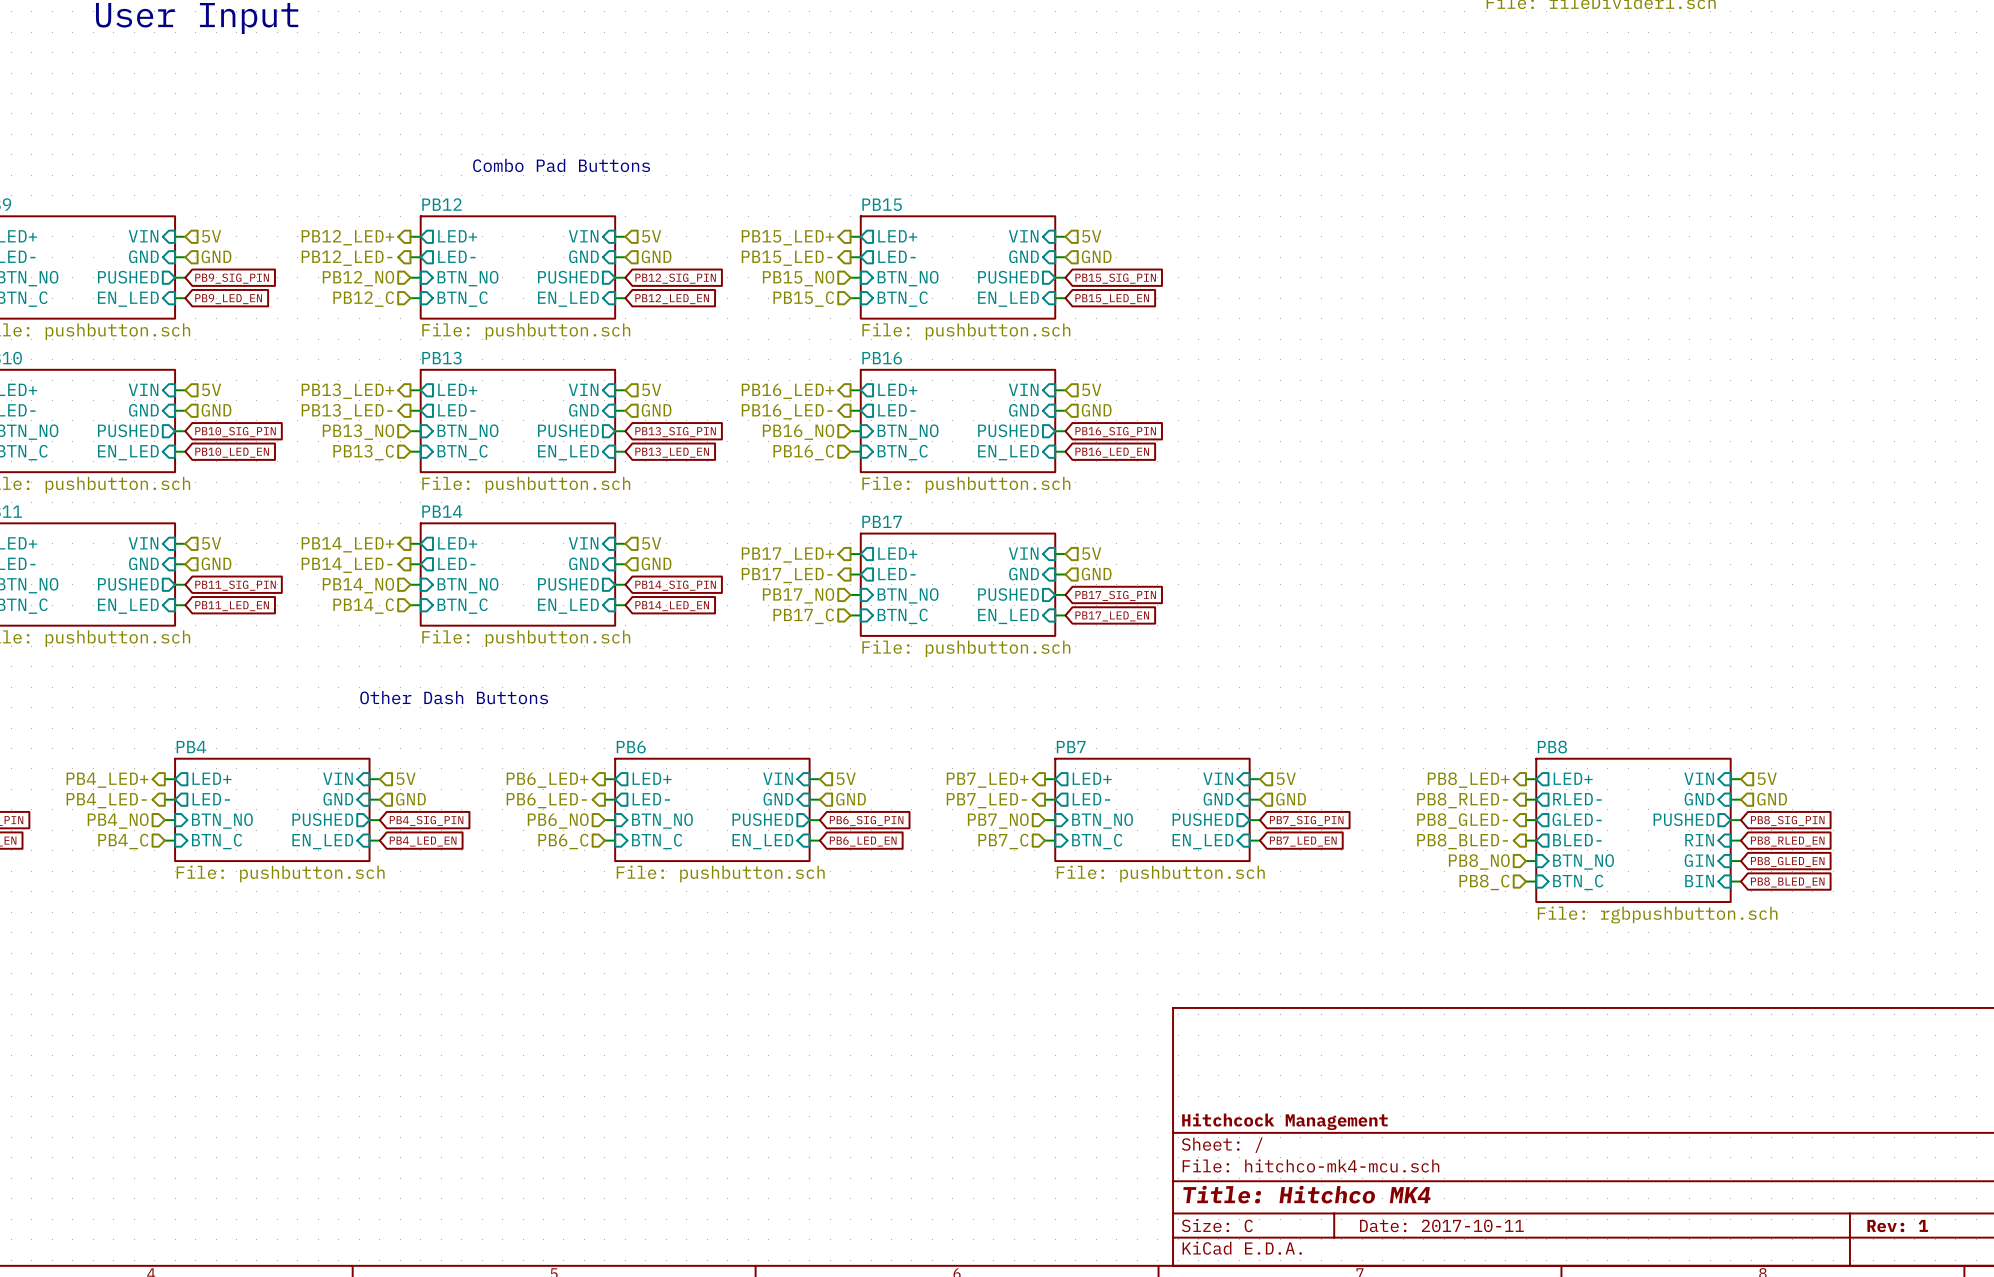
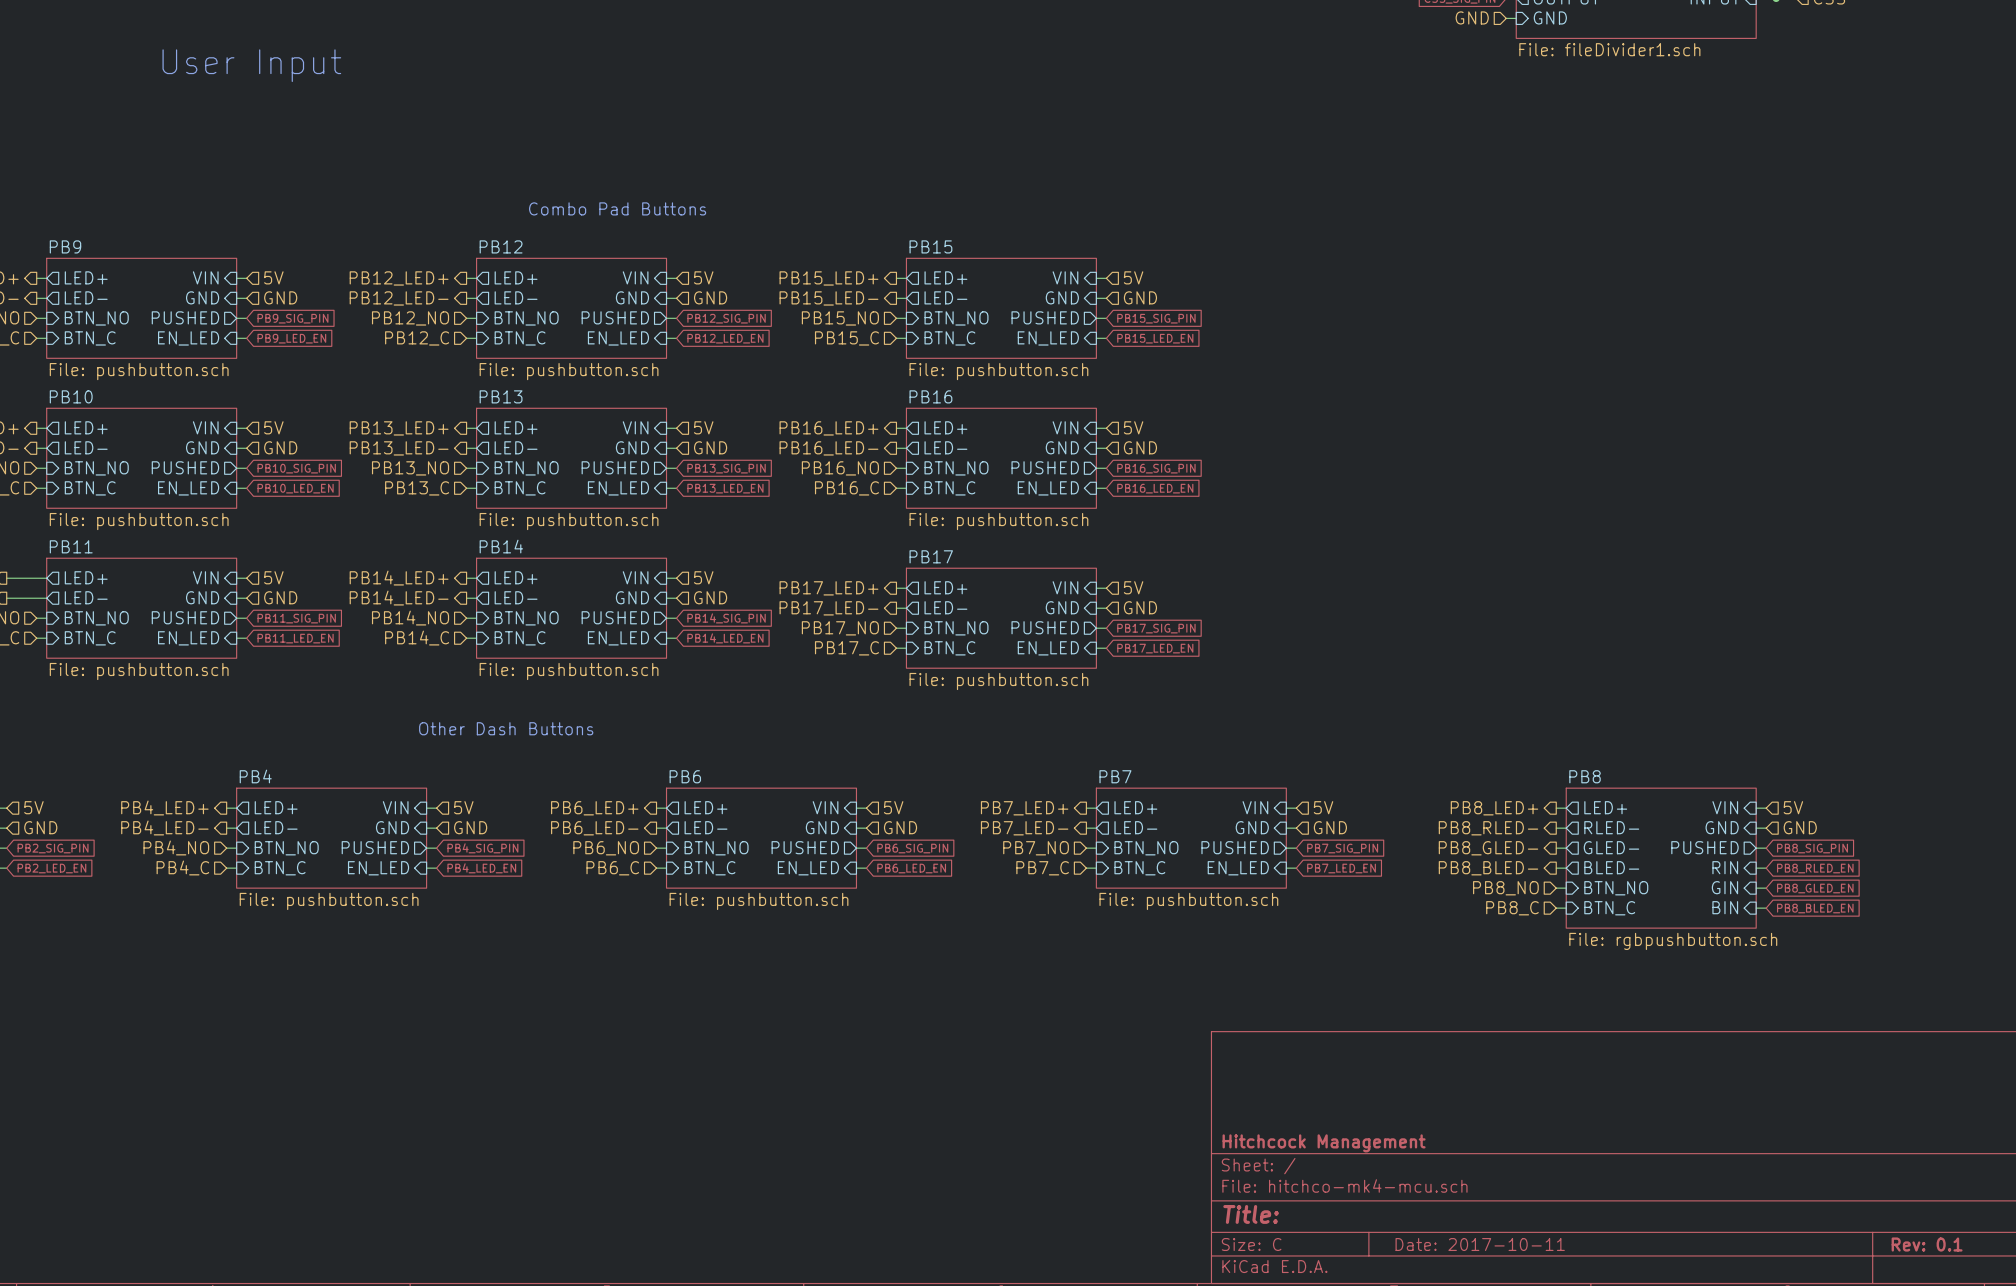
title block: Title: Hitchco MK4 (1306, 1194) -> Title: (1251, 1214)
title block: Rev: 1 (1897, 1226) -> Rev: 0.1 (1927, 1244)

